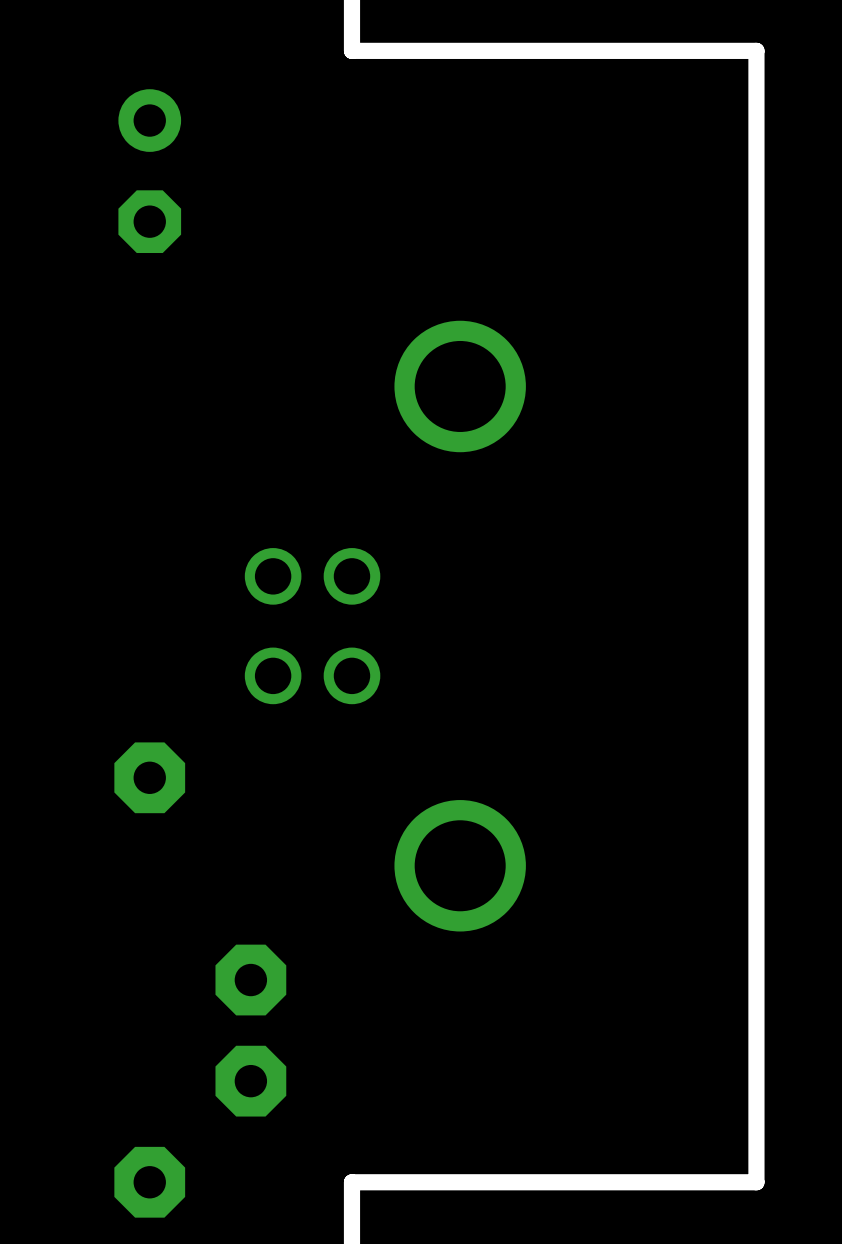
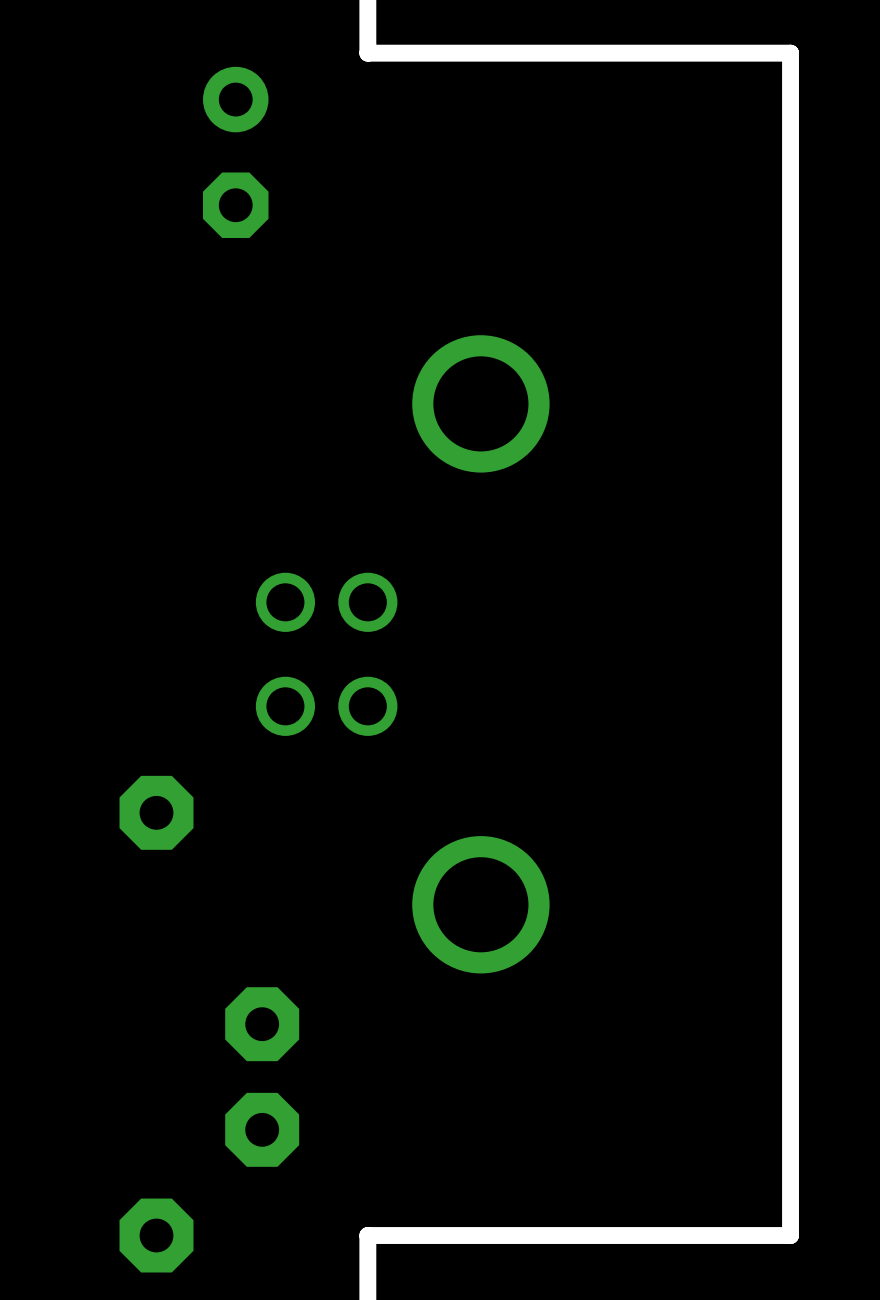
part position: (149, 171) -> (235, 152)

